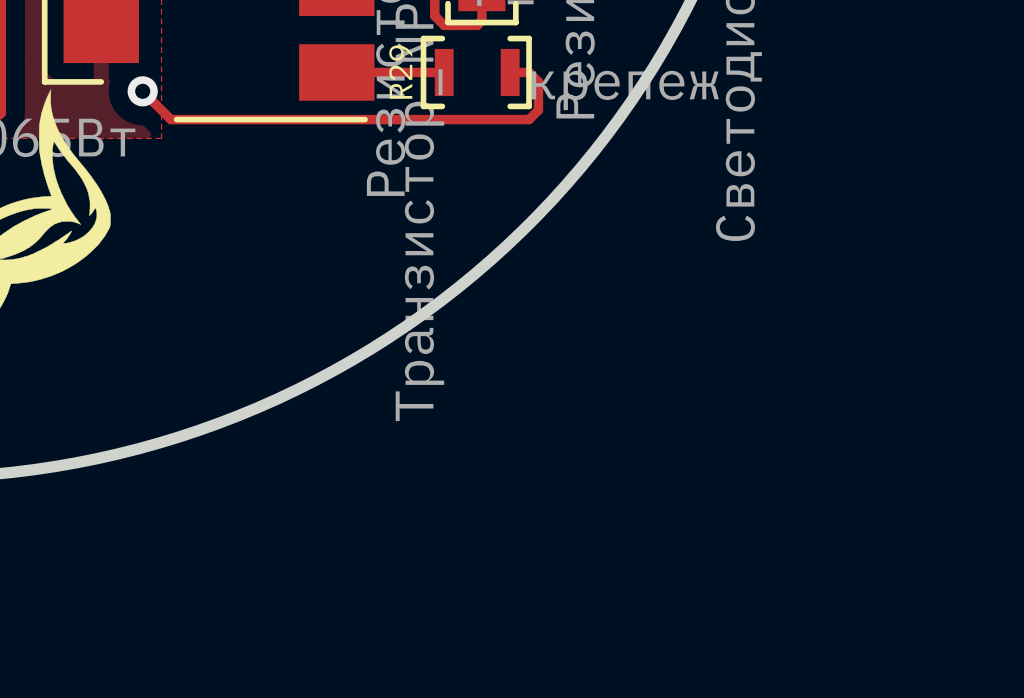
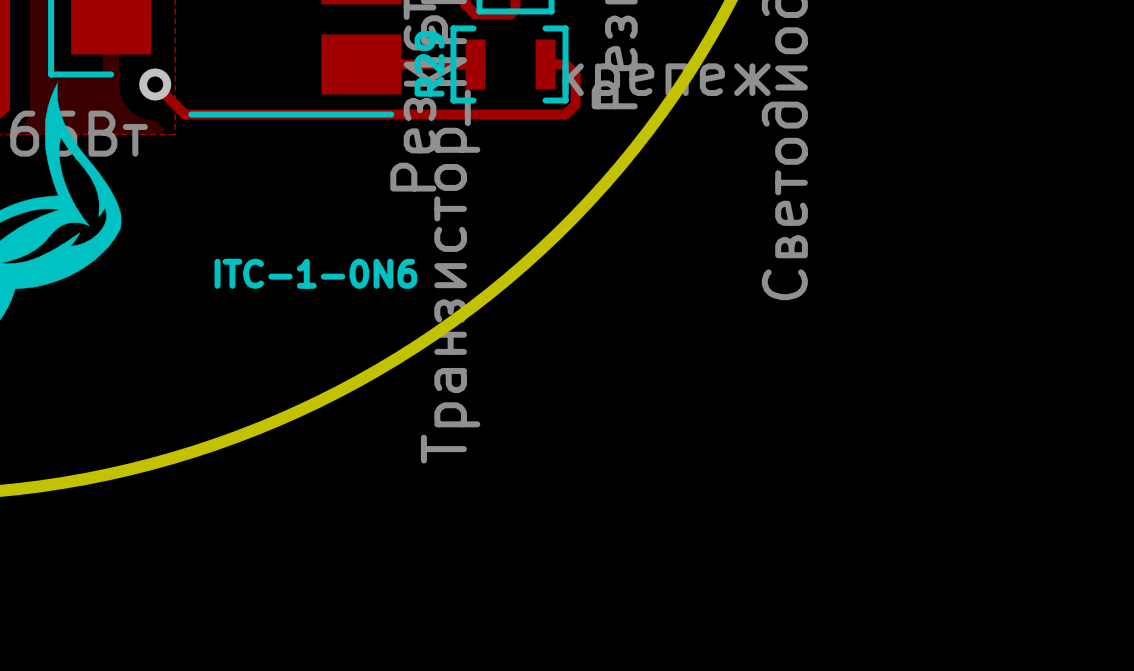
text: none -> ITC-1-0N6 (315, 273)

